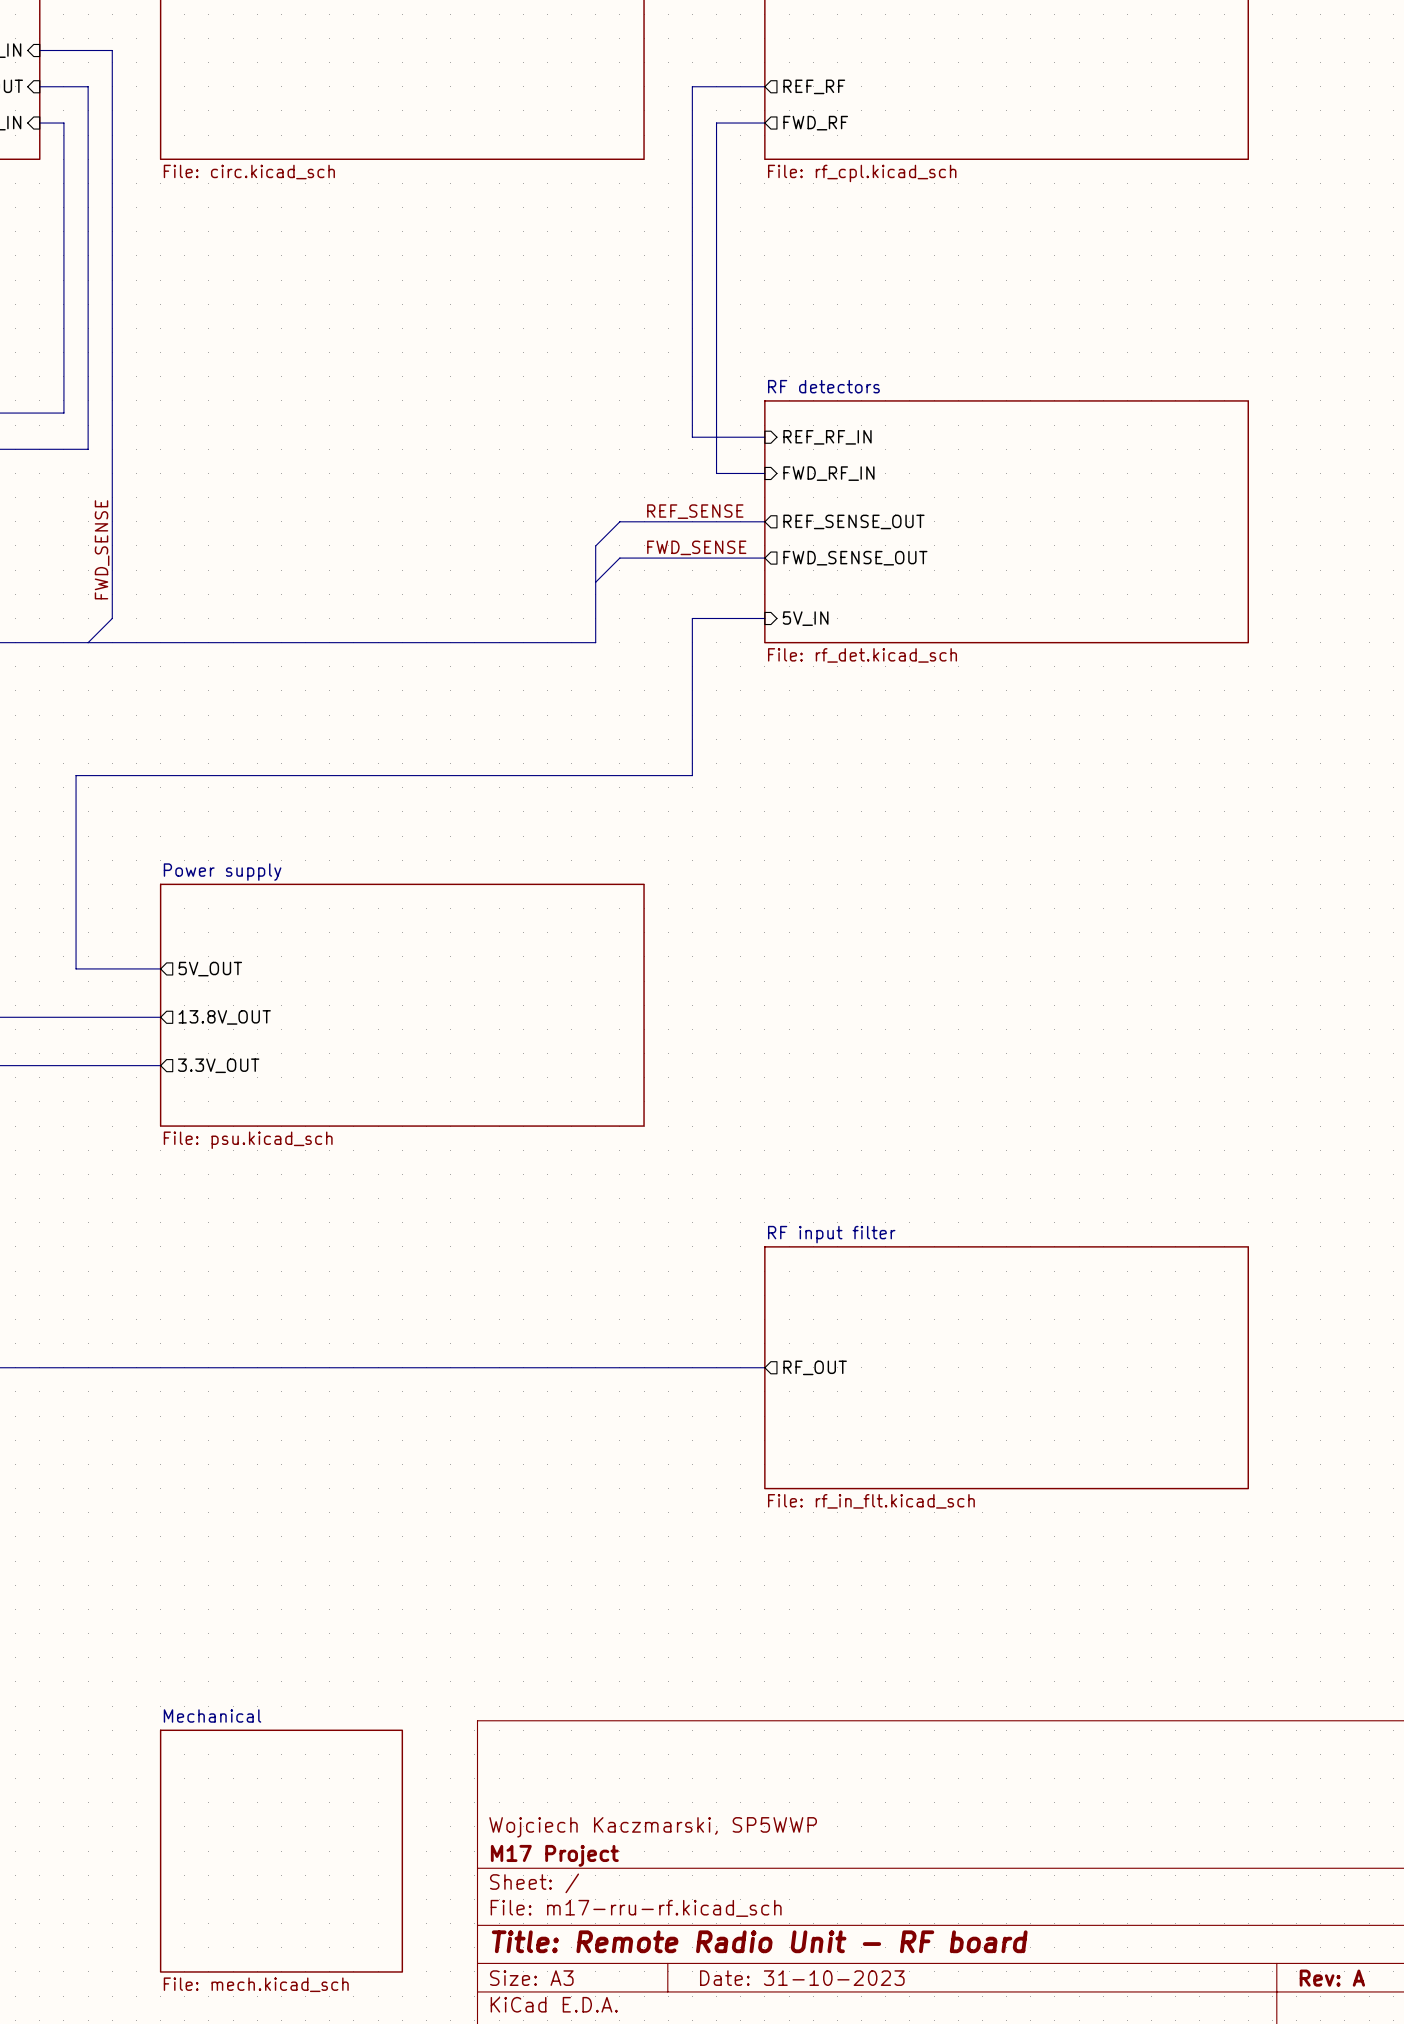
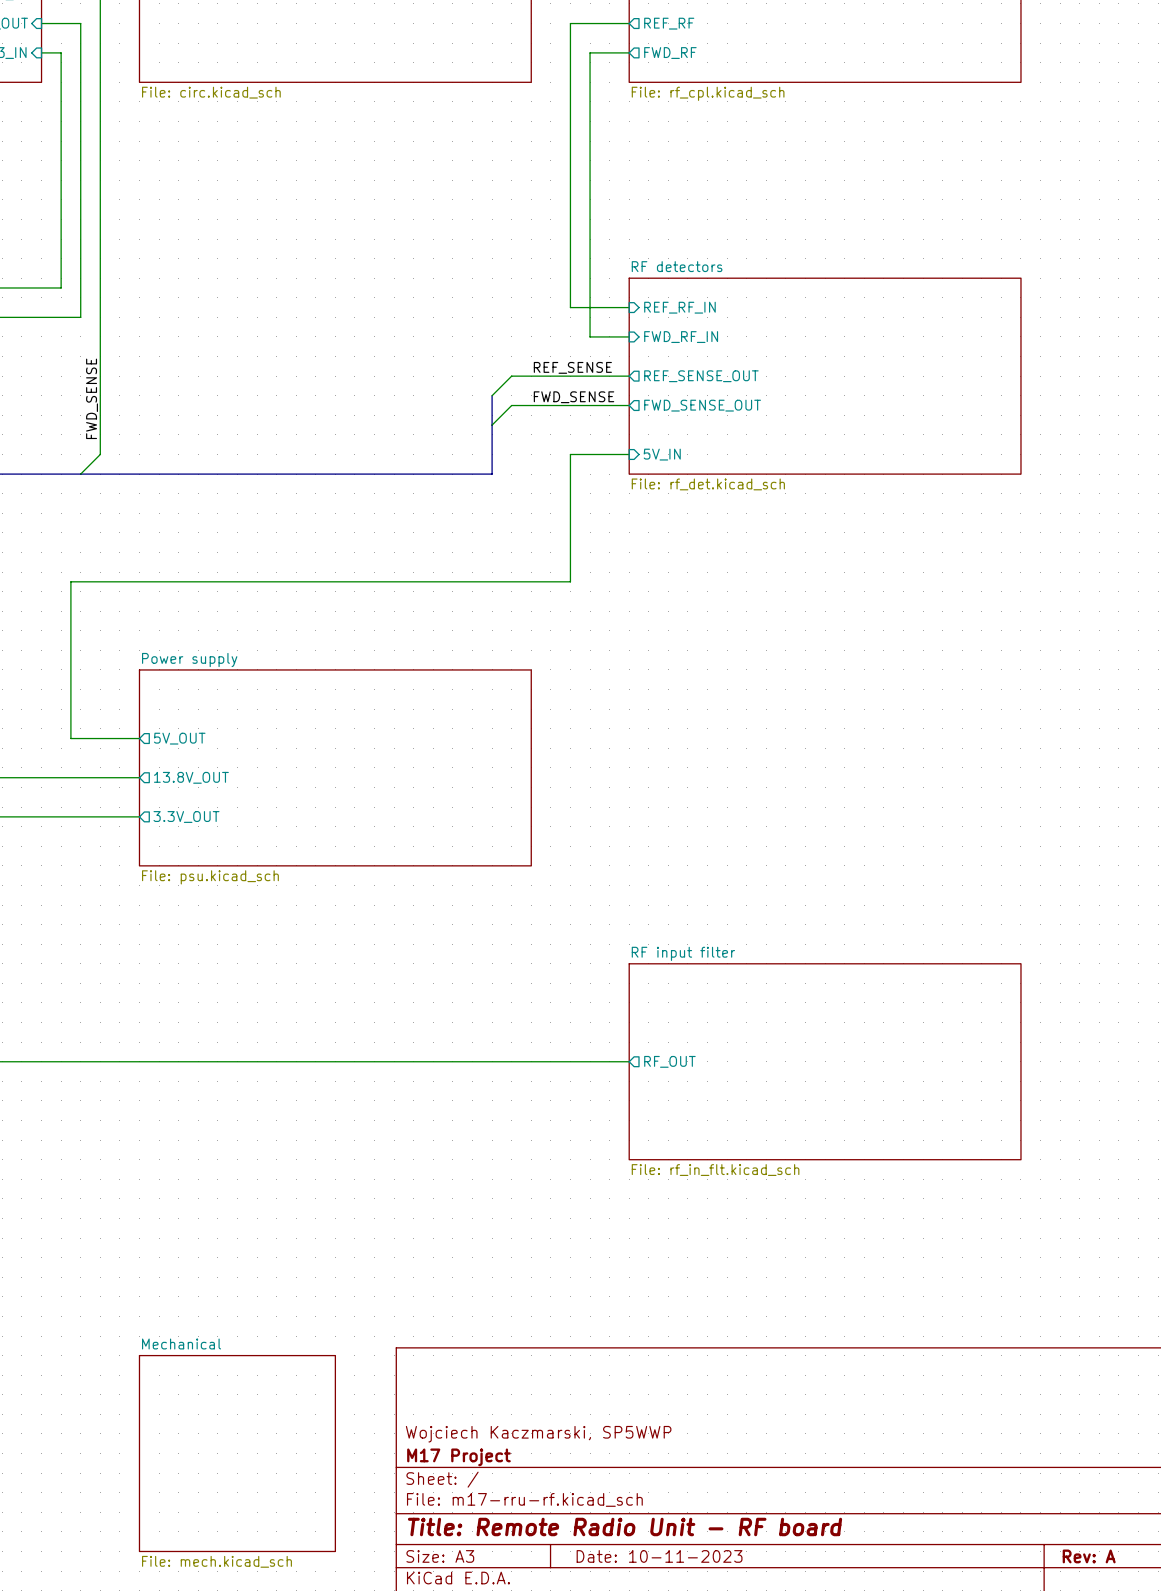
title block: Date: 31-10-2023 (802, 1978) -> Date: 10-11-2023 (659, 1556)

